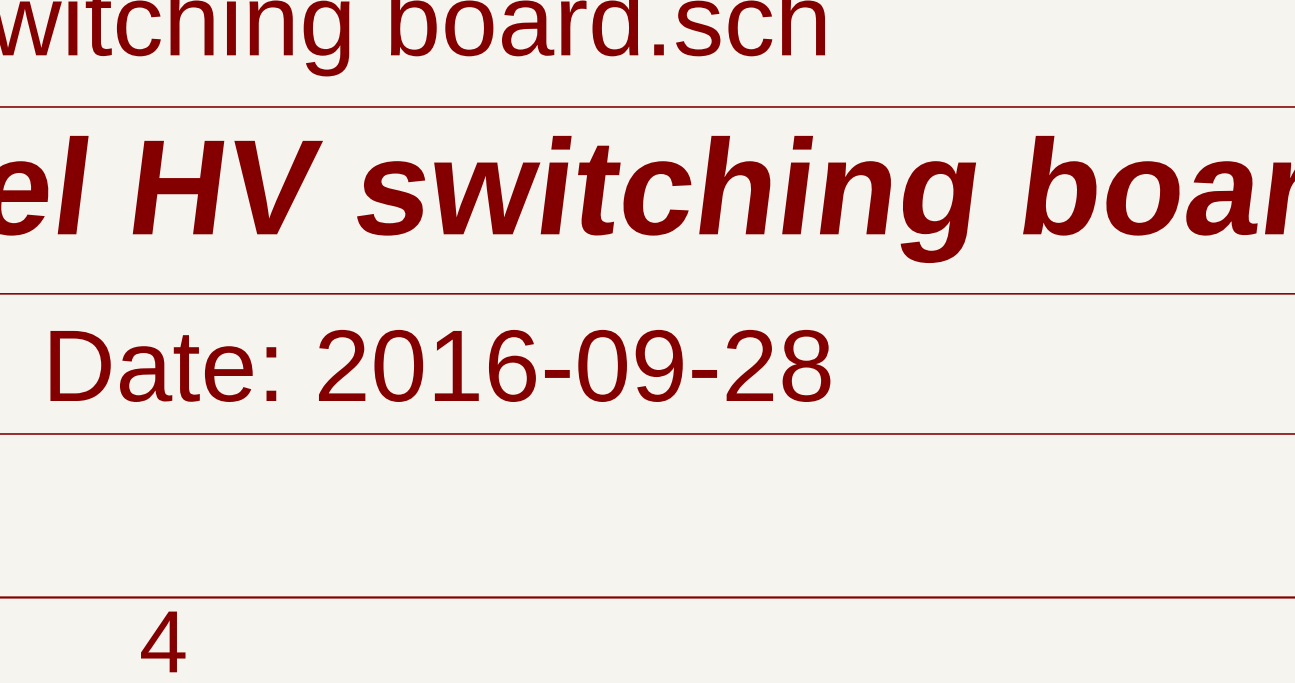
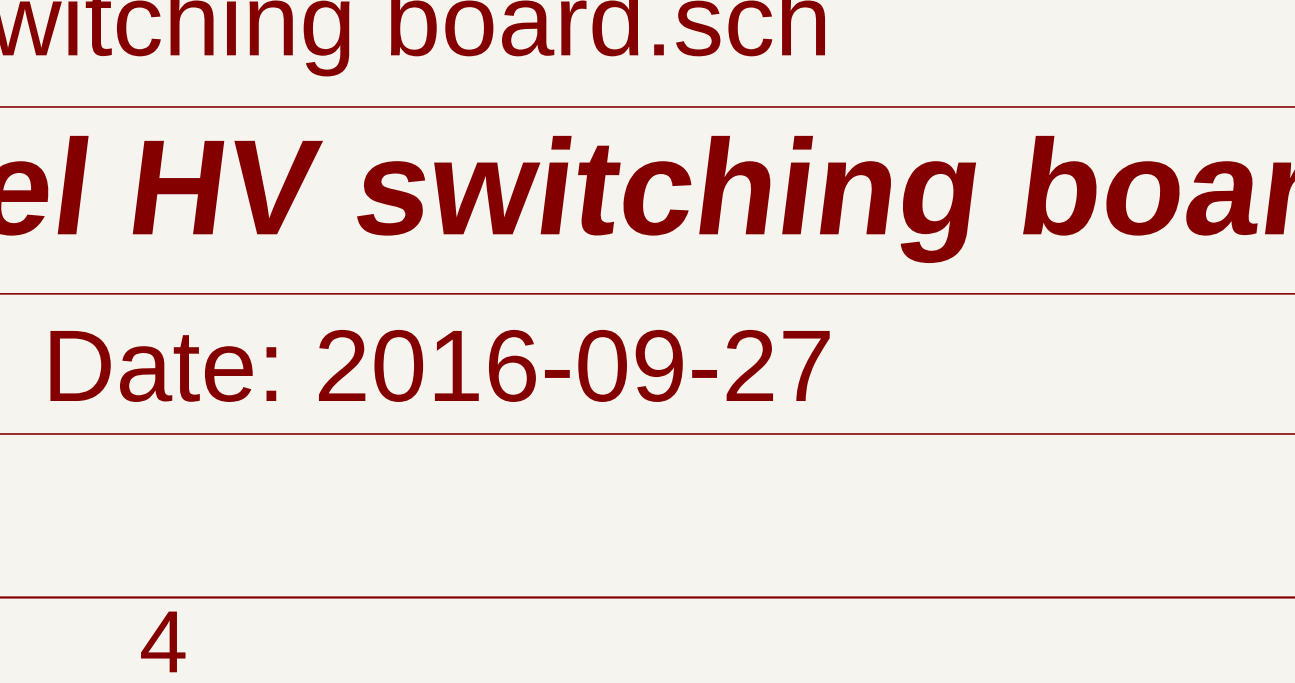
title block: Date: 2016-09-28 (440, 365) -> Date: 2016-09-27 (440, 365)

